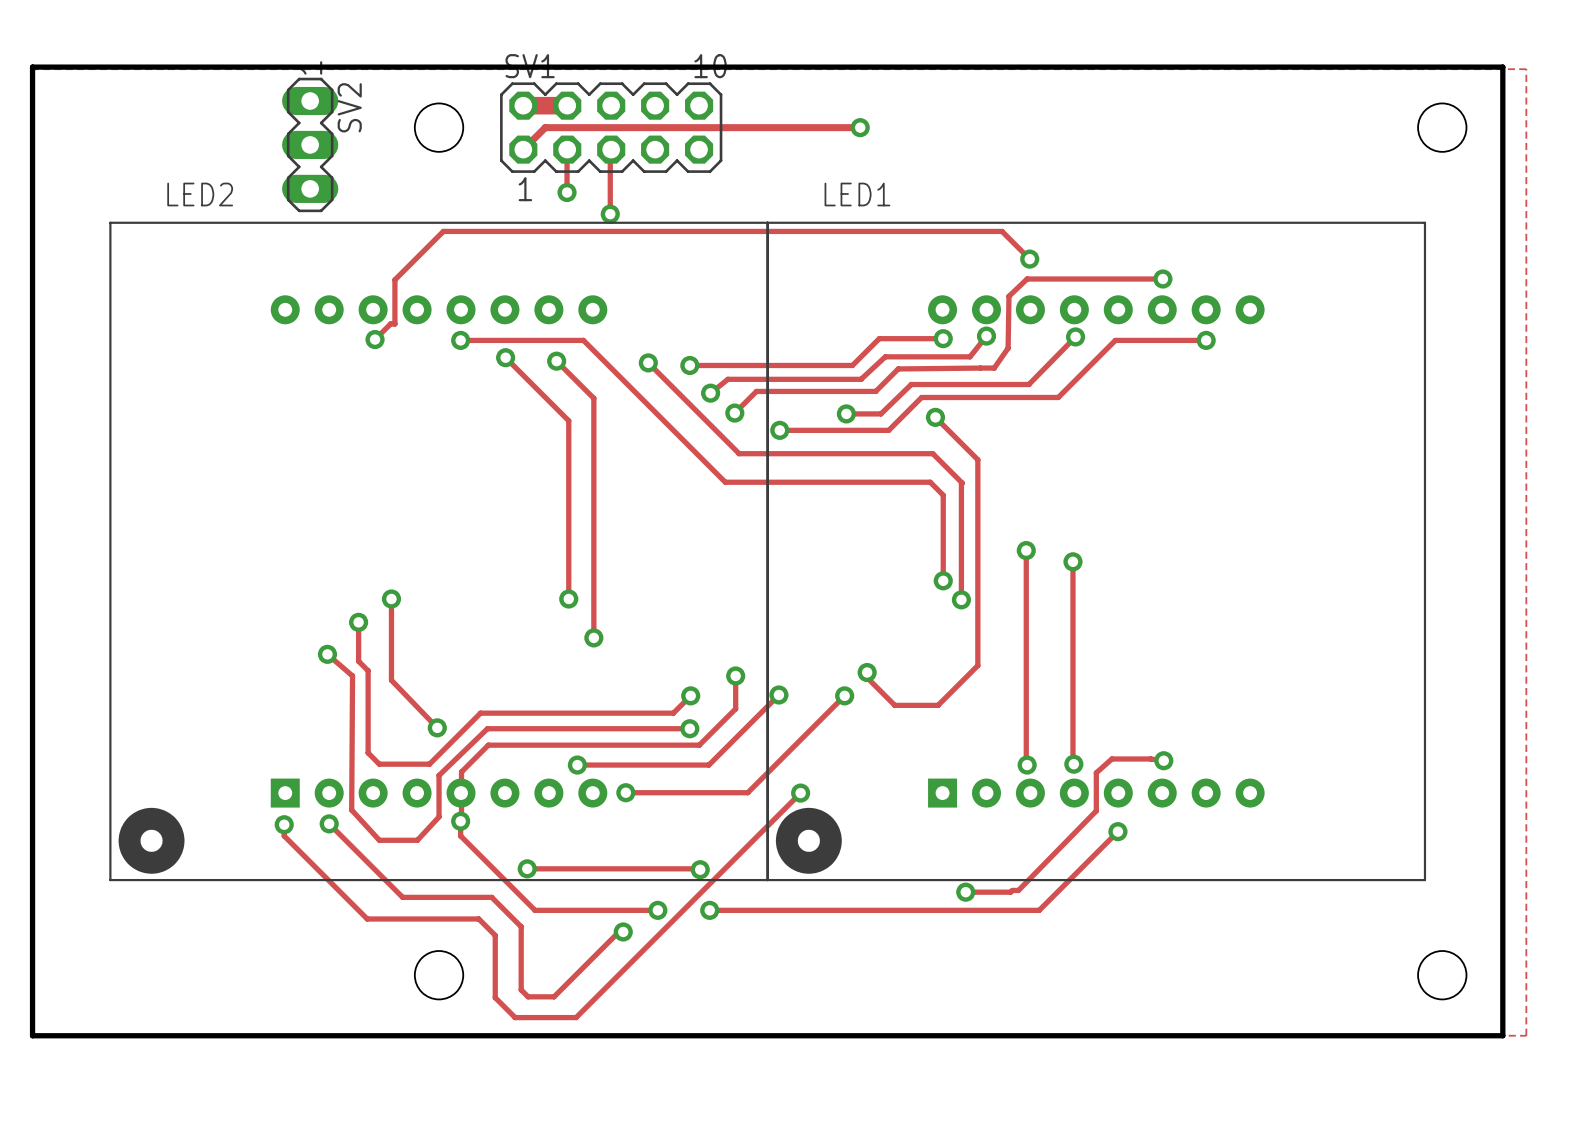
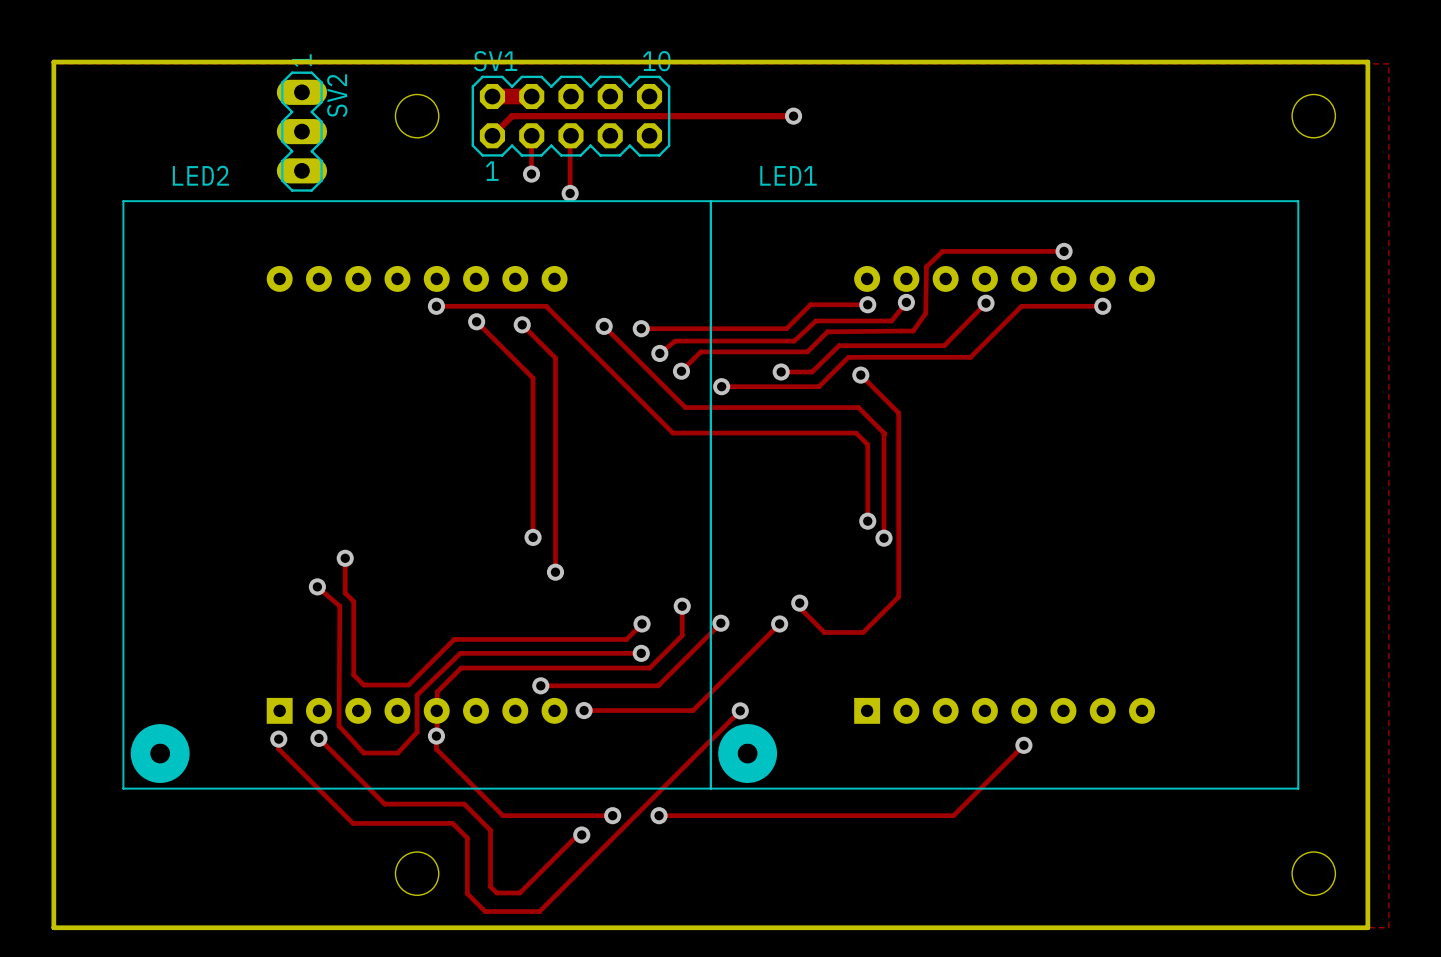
track: (1029, 259) (1002, 231) (443, 231) (394, 279) (394, 323) (390, 323) (374, 341) -> none
via: (1029, 259) -> none
via: (375, 339) -> none
track: (1026, 550) (1027, 765) -> none
via: (1026, 550) -> none
track: (1072, 561) (1073, 764) -> none
via: (1072, 561) -> none
track: (391, 599) (391, 680) (437, 727) -> none
via: (391, 599) -> none
via: (437, 727) -> none
track: (1163, 760) (1111, 758) (1096, 772) (1096, 810) (1018, 890) (965, 892) -> none
via: (1163, 760) -> none
via: (1073, 764) -> none
via: (1027, 765) -> none
track: (527, 868) (700, 869) -> none
via: (527, 868) -> none
via: (700, 869) -> none
via: (965, 892) -> none

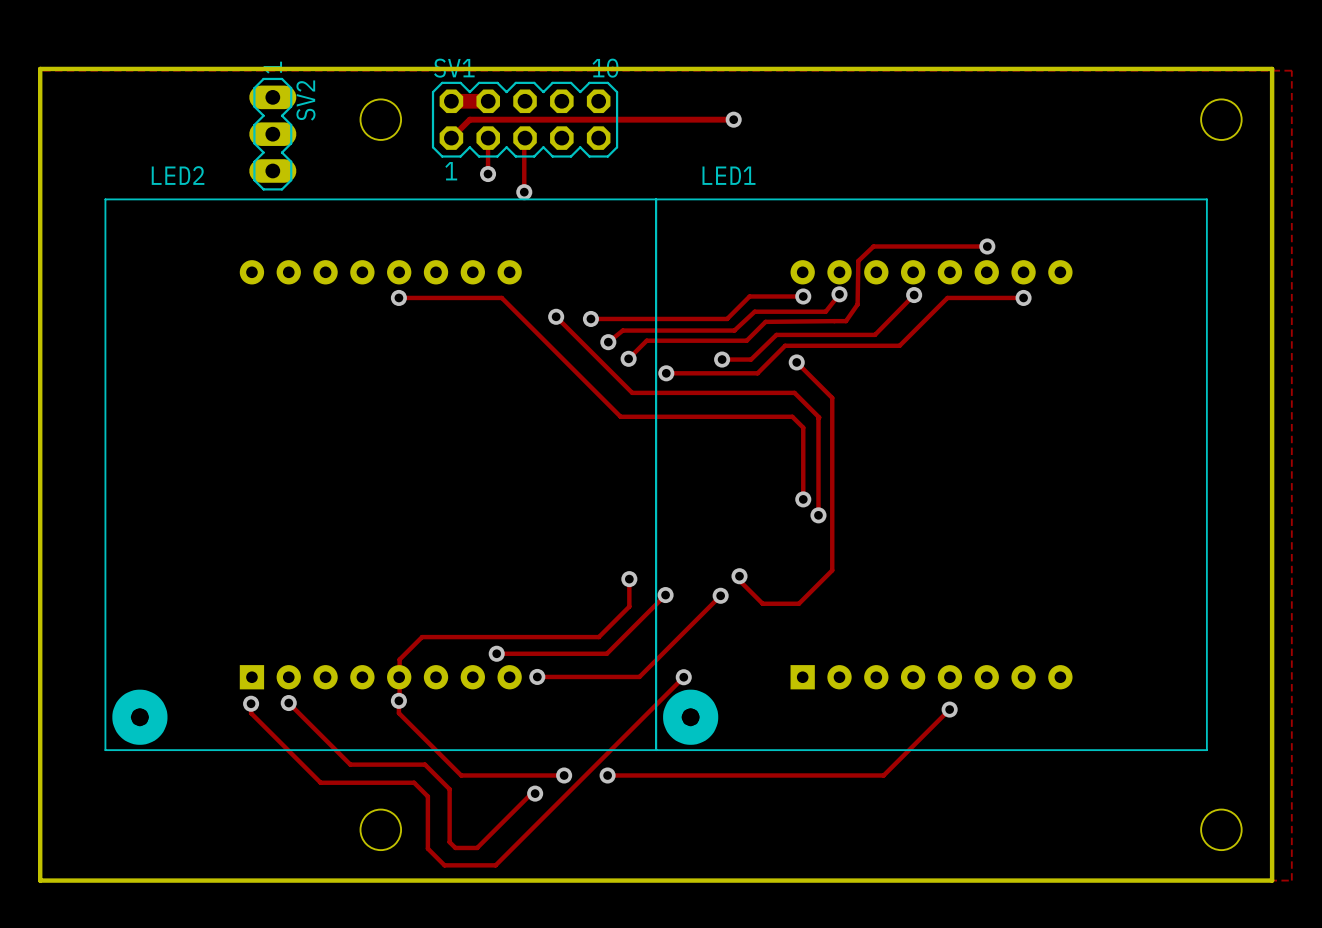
track: (476, 321) (533, 378) (533, 537) -> none
via: (476, 321) -> none
track: (522, 324) (555, 358) (555, 572) -> none
via: (522, 324) -> none
via: (533, 537) -> none
track: (345, 558) (345, 593) (353, 601) (353, 674) (363, 685) (408, 685) (454, 639) (626, 639) (642, 623) -> none
via: (345, 558) -> none
via: (555, 572) -> none
track: (317, 586) (339, 606) (339, 726) (363, 753) (397, 753) (417, 732) (417, 695) (460, 653) (641, 653) -> none
via: (317, 586) -> none
via: (642, 623) -> none
via: (641, 653) -> none

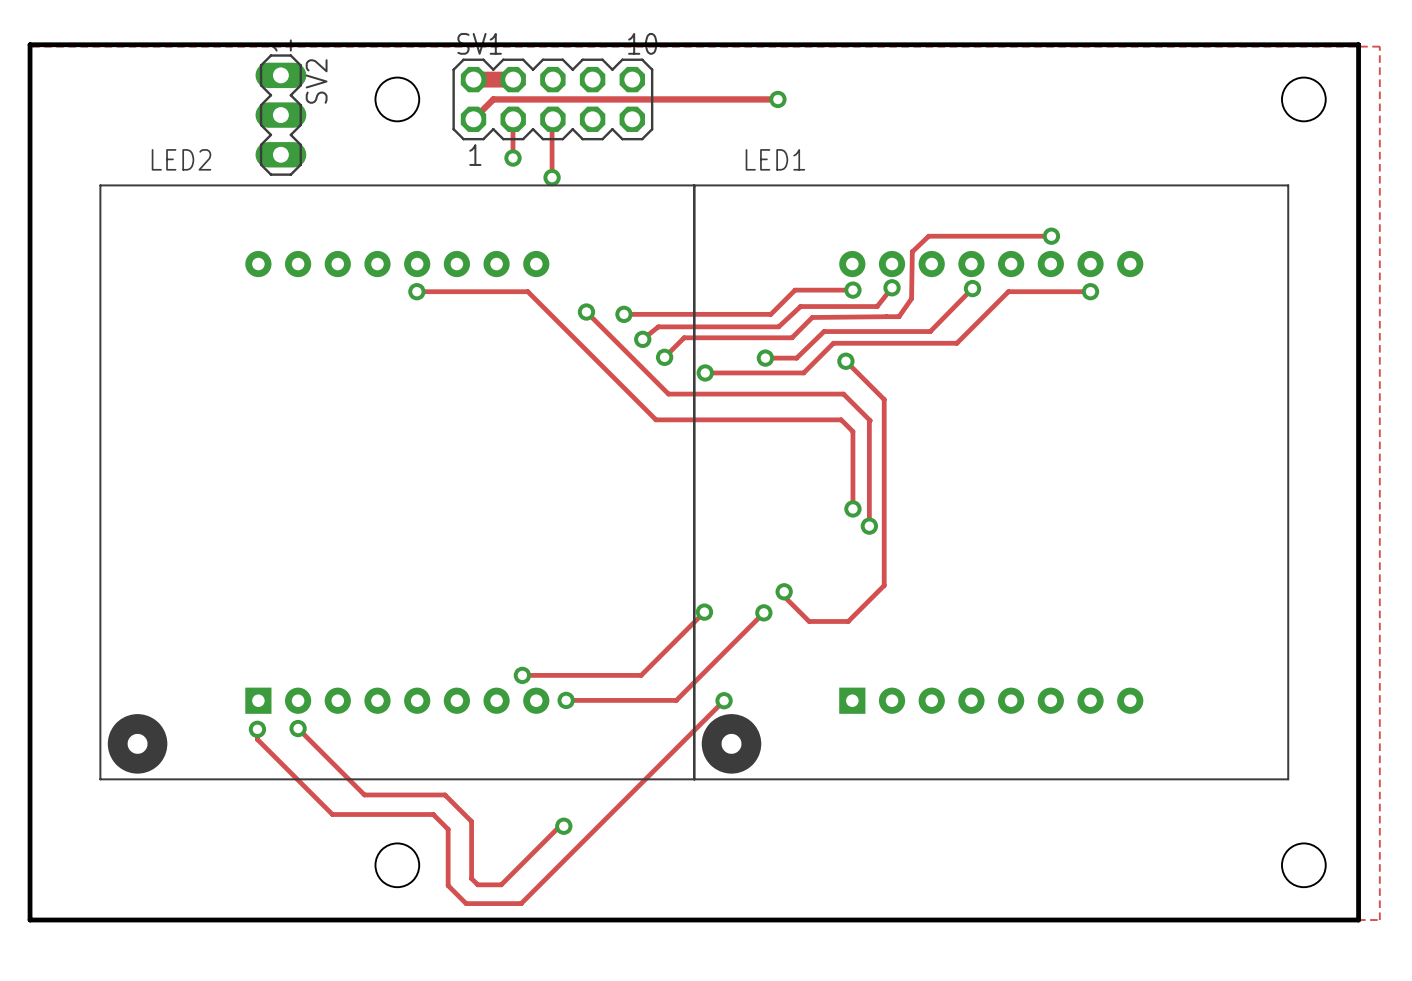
track: (629, 579) (629, 606) (598, 637) (422, 637) (399, 659) (398, 713) (461, 775) (564, 775) -> none
via: (629, 579) -> none
via: (398, 700) -> none
track: (949, 709) (883, 775) (607, 775) -> none
via: (949, 709) -> none
via: (564, 775) -> none
via: (607, 775) -> none

